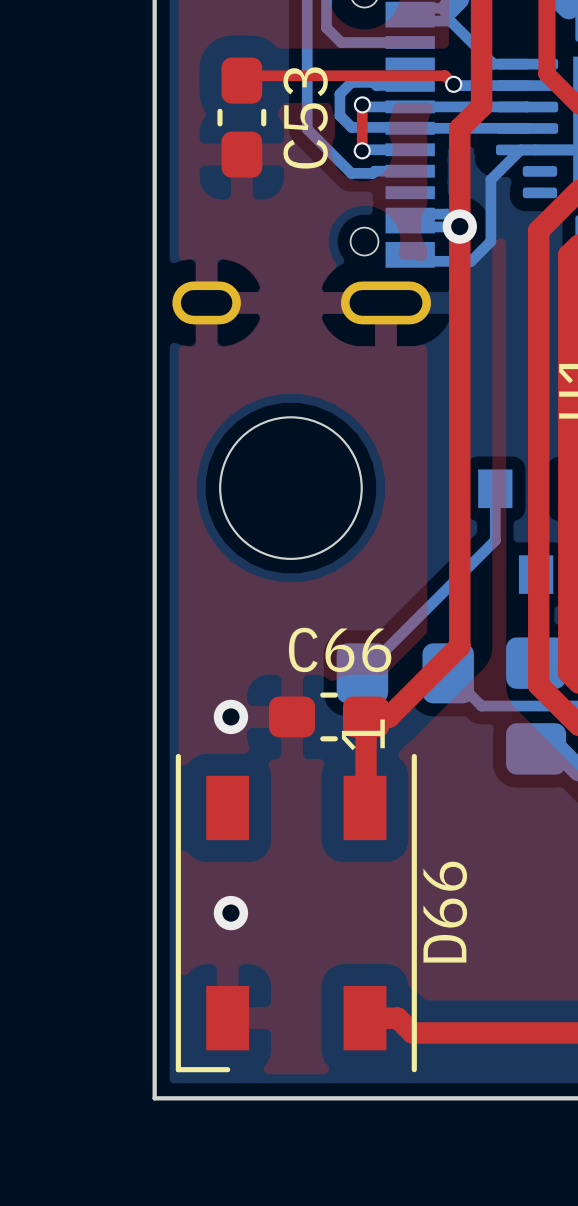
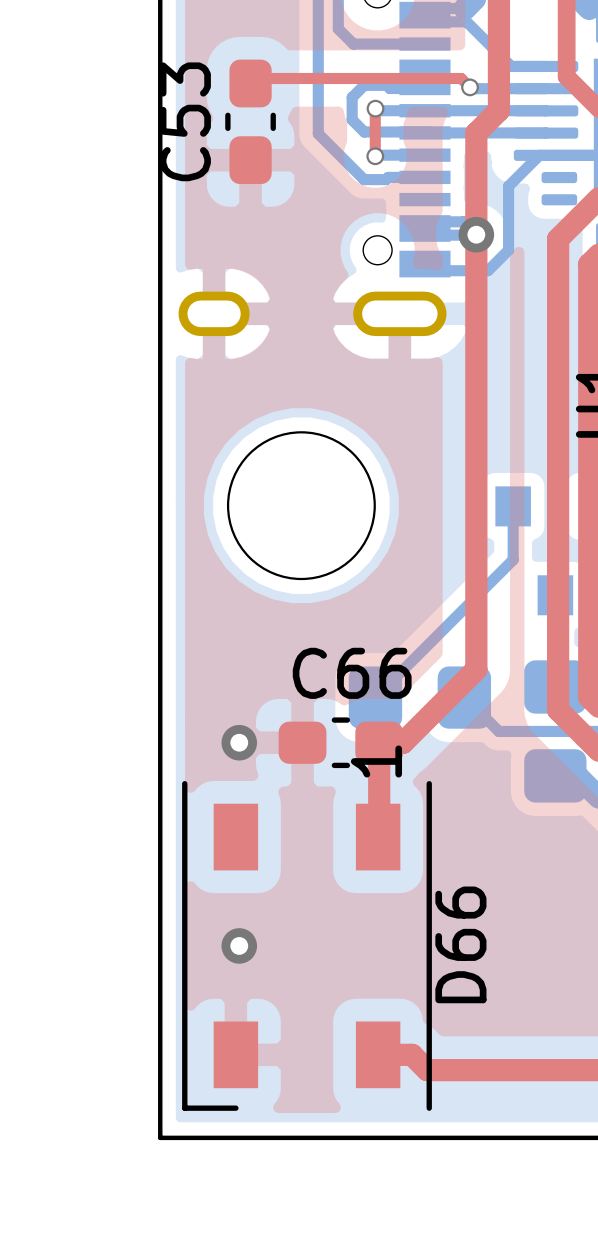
C53 name position: C53 (305, 117) -> C53 (185, 121)

